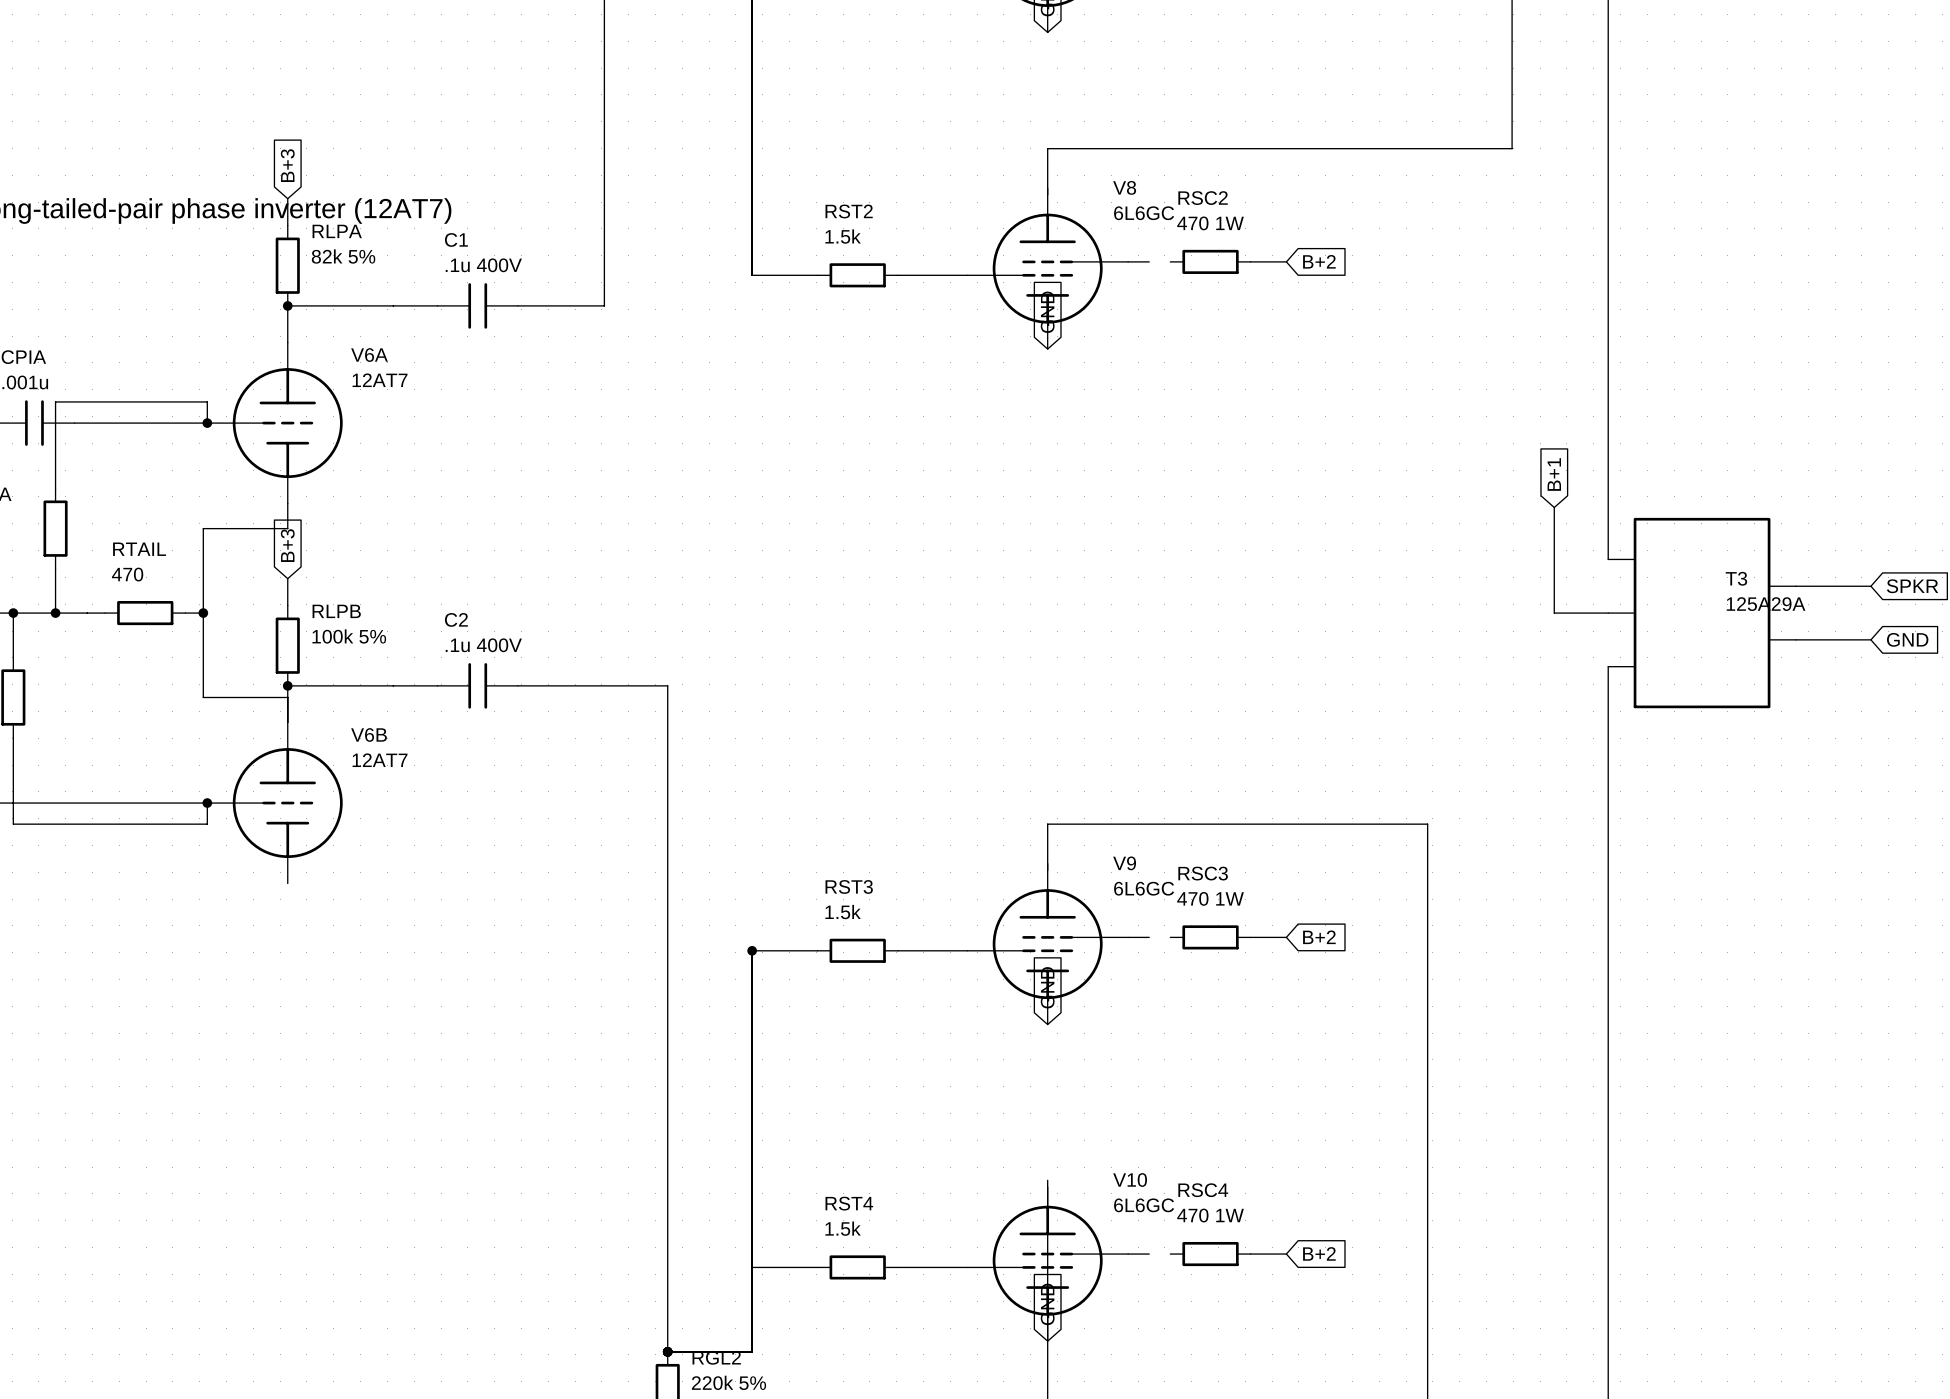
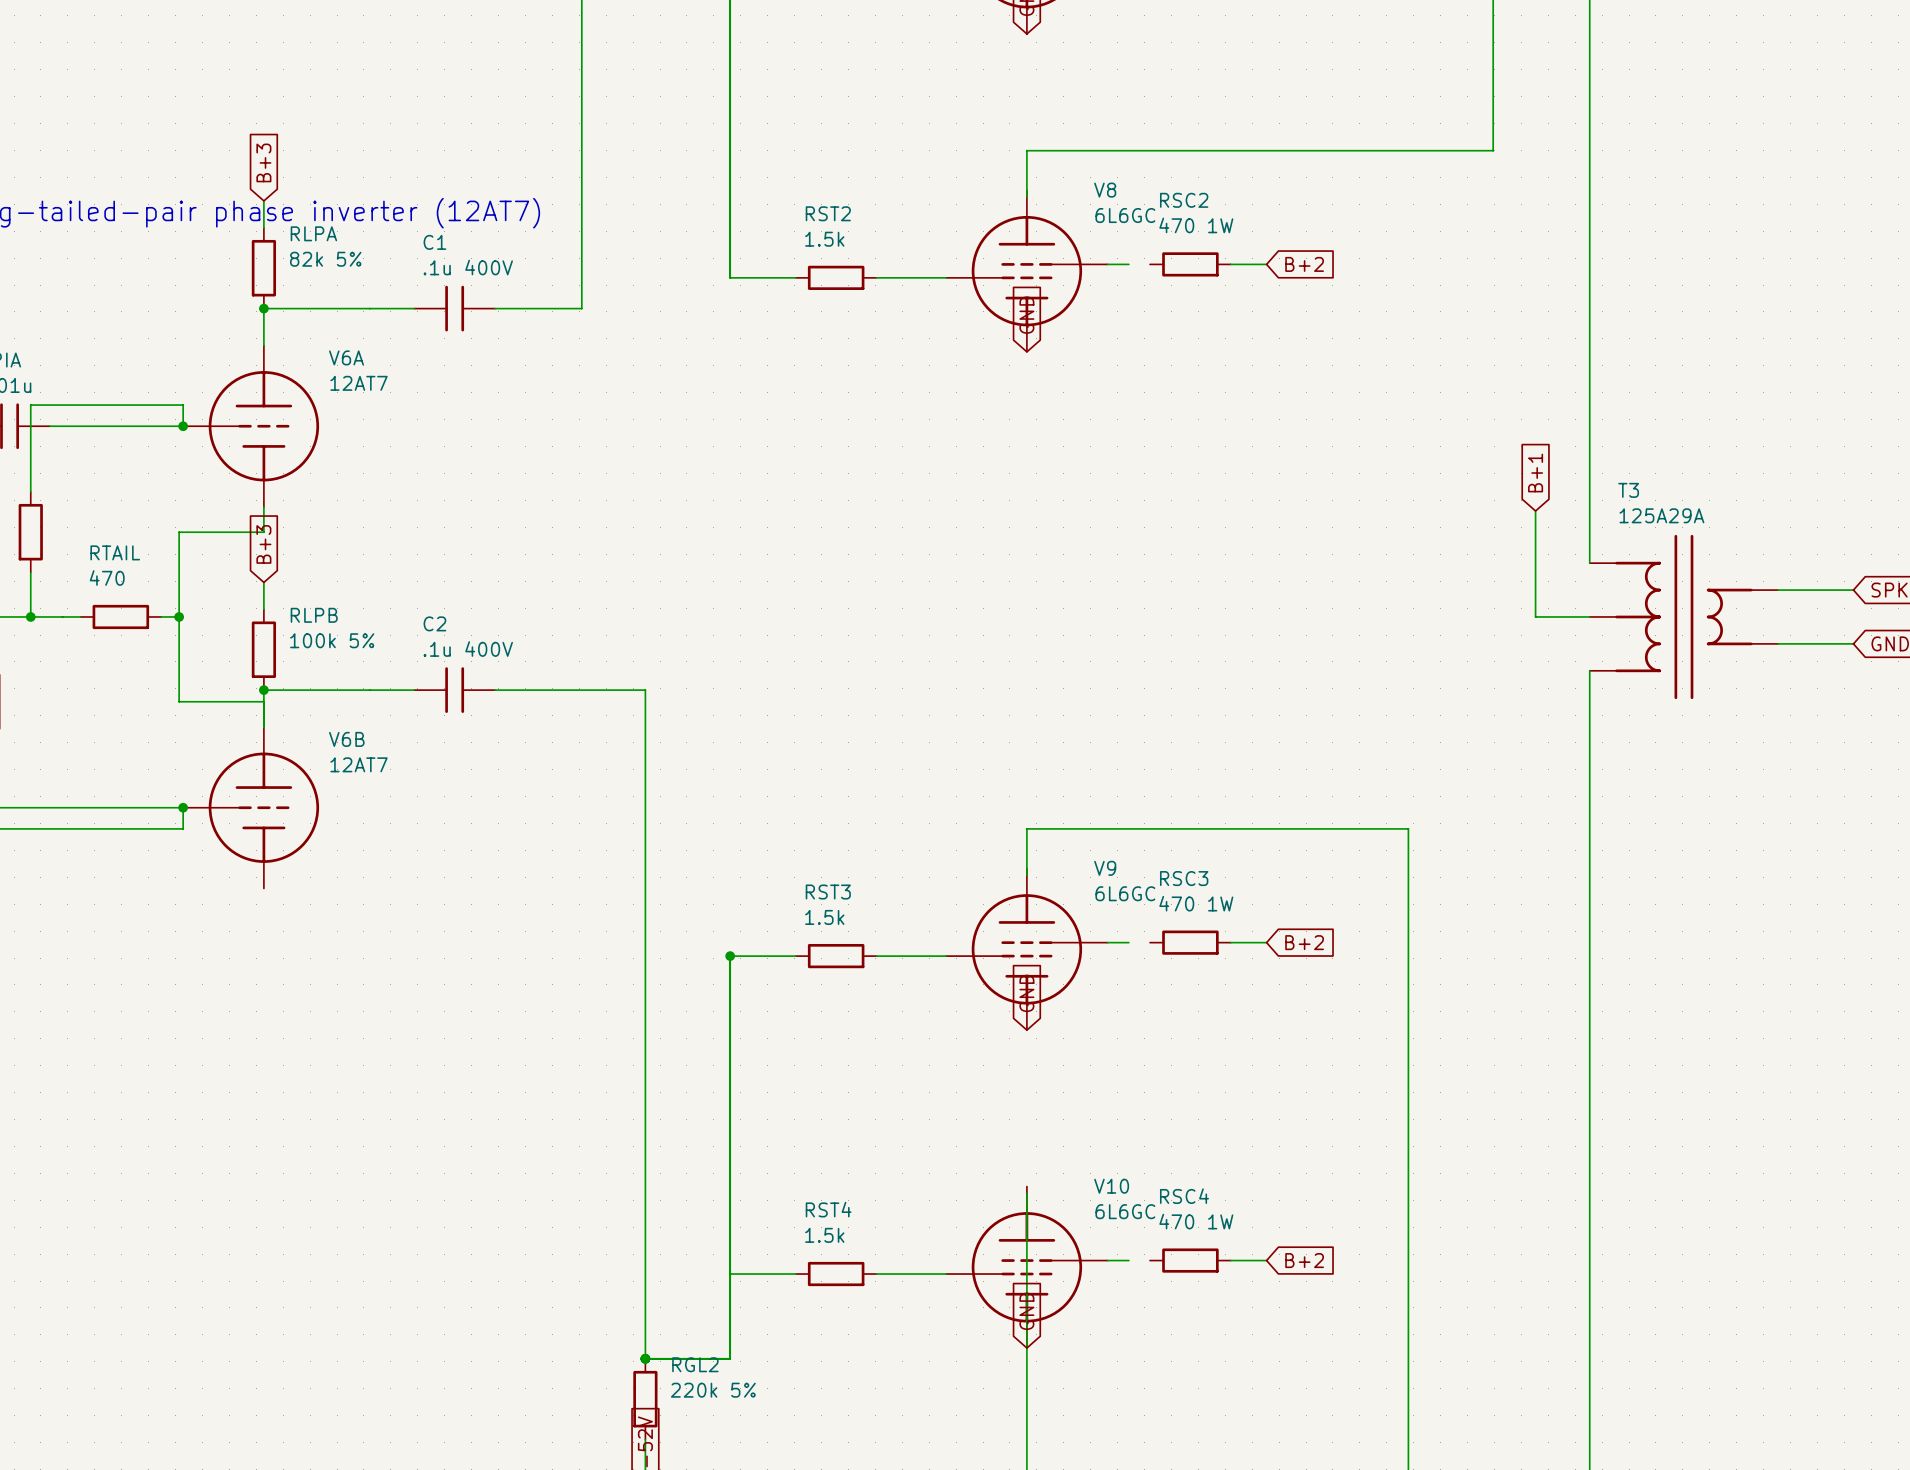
T3 symbol: [1608, 517, 1796, 709] -> [1589, 534, 1779, 700]
T3 name position: T3 (1736, 578) -> T3 (1628, 490)
T3 value position: 125A29A (1766, 604) -> 125A29A (1661, 515)

